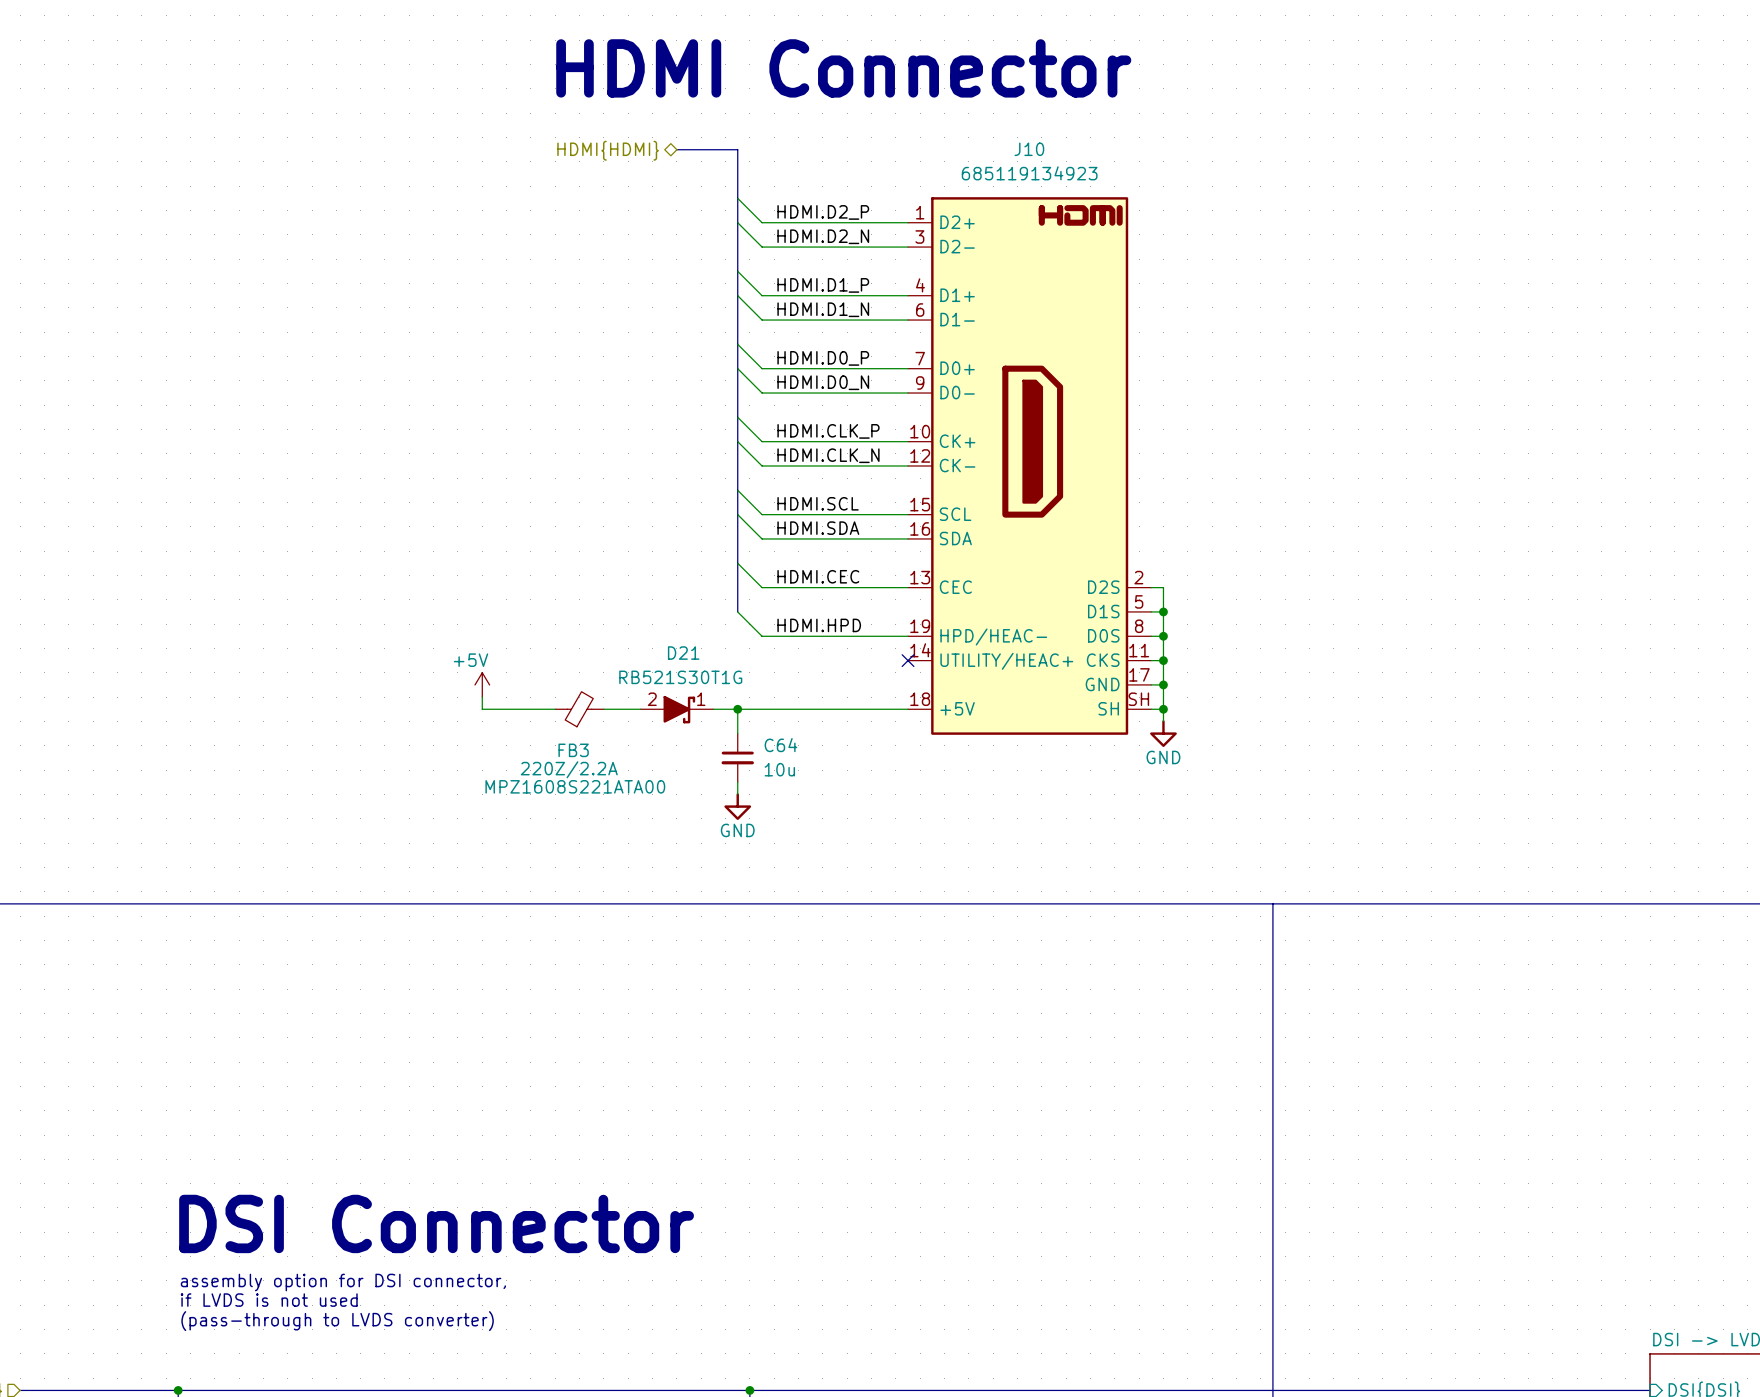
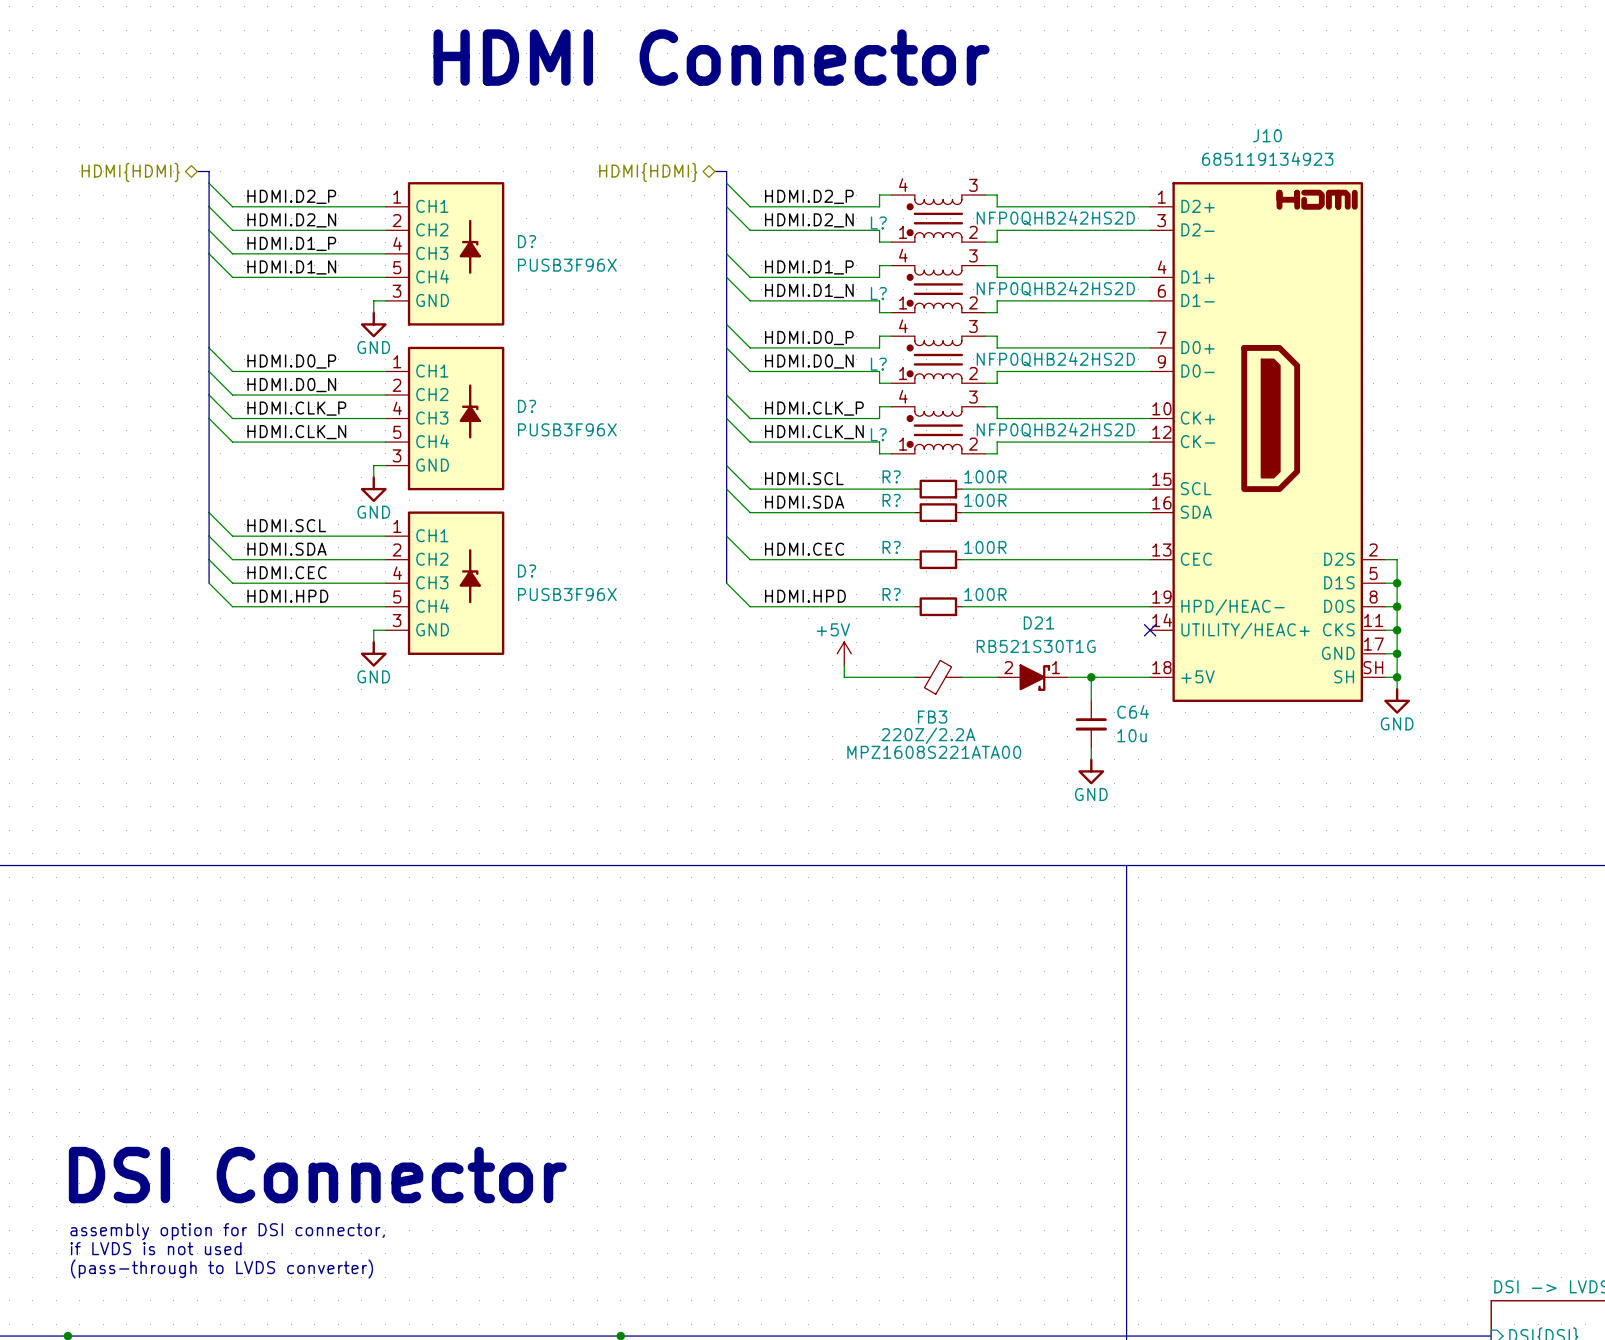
bus: (676, 149) (737, 149) (737, 611) -> none
hierarchical label position: HDMI{HDMI} (608, 150) -> HDMI{HDMI} (648, 172)
bus: none -> (197, 171) (209, 171) (209, 583)
bus: none -> (714, 171) (726, 171) (726, 583)
hierarchical label: none -> HDMI{HDMI} (130, 172)
wire: none -> (209, 183) (232, 206) (385, 206)
wire: (737, 198) (762, 222) (883, 222) -> (726, 183) (750, 206)
wire: none -> (985, 195) (997, 195) (997, 206) (1150, 206)
label: none -> HDMI.D2_P (291, 196)
label position: HDMI.D2_P (823, 212) -> HDMI.D2_P (809, 196)
wire: none -> (209, 206) (232, 230) (385, 230)
wire: (737, 222) (762, 247) (883, 247) -> (726, 206) (750, 230)
L?: none -> (938, 218)
label: none -> HDMI.D2_N (291, 220)
label position: HDMI.D2_N (823, 236) -> HDMI.D2_N (809, 220)
wire: none -> (209, 230) (232, 253) (385, 253)
wire: none -> (1150, 230) (997, 230) (997, 242) (985, 242)
label: none -> HDMI.D1_P (291, 243)
wire: none -> (209, 253) (232, 277) (385, 277)
D?: none -> (444, 253)
wire: (737, 271) (762, 295) (883, 295) -> (726, 253) (750, 277)
wire: none -> (985, 265) (997, 265) (997, 277) (1150, 277)
label: none -> HDMI.D1_N (291, 267)
label position: HDMI.D1_P (823, 285) -> HDMI.D1_P (809, 267)
wire: (737, 295) (762, 320) (883, 320) -> (726, 277) (750, 300)
L?: none -> (938, 289)
label position: HDMI.D1_N (823, 309) -> HDMI.D1_N (809, 290)
wire: none -> (385, 300) (373, 300) (373, 312)
wire: none -> (1150, 300) (997, 300) (997, 312) (985, 312)
power symbol: none -> GND (373, 324)
wire: (737, 344) (762, 368) (883, 368) -> (726, 324) (750, 347)
wire: none -> (985, 336) (997, 336) (997, 347) (1150, 347)
label position: HDMI.D0_P (823, 358) -> HDMI.D0_P (809, 338)
wire: none -> (209, 347) (232, 371) (385, 371)
wire: (737, 368) (762, 393) (883, 393) -> (726, 347) (750, 371)
L?: none -> (938, 359)
label: none -> HDMI.D0_P (291, 361)
label position: HDMI.D0_N (823, 382) -> HDMI.D0_N (809, 361)
wire: none -> (209, 371) (232, 395) (385, 395)
wire: none -> (1150, 371) (997, 371) (997, 383) (985, 383)
label: none -> HDMI.D0_N (291, 385)
wire: none -> (209, 395) (232, 418) (385, 418)
wire: (737, 417) (762, 441) (883, 441) -> (726, 395) (750, 418)
wire: none -> (985, 406) (997, 406) (997, 418) (1150, 418)
label: none -> HDMI.CLK_P (296, 408)
label position: HDMI.CLK_P (828, 431) -> HDMI.CLK_P (814, 408)
wire: none -> (209, 418) (232, 442) (385, 442)
D?: none -> (444, 418)
wire: (737, 441) (762, 465) (883, 465) -> (726, 418) (750, 442)
L?: none -> (938, 430)
label: none -> HDMI.CLK_N (296, 432)
label position: HDMI.CLK_N (828, 455) -> HDMI.CLK_N (814, 432)
J10 position: (1029, 465) -> (1267, 442)
wire: none -> (1150, 442) (997, 442) (997, 453) (985, 453)
wire: none -> (385, 465) (373, 465) (373, 477)
wire: (737, 490) (762, 514) (883, 514) -> (726, 465) (750, 489)
label position: HDMI.SCL (818, 503) -> HDMI.SCL (804, 478)
power symbol: none -> GND (373, 489)
wire: (737, 514) (762, 538) (883, 538) -> (726, 489) (750, 512)
R?: none -> (938, 489)
wire: none -> (961, 489) (1150, 489)
label position: HDMI.SDA (818, 528) -> HDMI.SDA (804, 502)
wire: none -> (209, 512) (232, 536) (385, 536)
R?: none -> (938, 512)
wire: none -> (961, 512) (1150, 512)
label: none -> HDMI.SCL (286, 525)
wire: none -> (209, 536) (232, 559) (385, 559)
wire: (737, 563) (762, 587) (883, 587) -> (726, 536) (750, 559)
label: none -> HDMI.SDA (287, 549)
label position: HDMI.CEC (818, 576) -> HDMI.CEC (804, 549)
wire: none -> (209, 559) (232, 583) (385, 583)
R?: none -> (938, 559)
wire: (1163, 587) (1163, 721) -> (1020, 559) (1150, 559)
wire: none -> (1385, 559) (1397, 559) (1397, 689)
label: none -> HDMI.CEC (287, 572)
wire: none -> (209, 583) (232, 606) (385, 606)
D?: none -> (444, 583)
wire: (737, 611) (762, 636) (883, 636) -> (726, 583) (750, 606)
wire: (1151, 611) (1163, 611) -> none
junction: (1163, 611) -> none
wire: none -> (1385, 583) (1397, 583)
junction: none -> (1397, 583)
label: none -> HDMI.HPD (287, 596)
label position: HDMI.HPD (819, 625) -> HDMI.HPD (805, 596)
R?: none -> (938, 606)
wire: none -> (1020, 606) (1150, 606)
junction: (1163, 636) -> none
wire: none -> (1385, 606) (1397, 606)
junction: none -> (1397, 606)
wire: none -> (385, 630) (373, 630) (373, 642)
no-connect mark: (908, 660) -> none
wire: (1151, 660) (1163, 660) -> none
junction: (1163, 660) -> none
no-connect mark: none -> (1150, 630)
wire: none -> (1385, 630) (1397, 630)
junction: none -> (1397, 630)
power symbol: +5V (482, 684) -> none
power symbol: none -> GND (373, 653)
power symbol: none -> +5V (844, 653)
wire: (1151, 684) (1163, 684) -> none
junction: (1163, 684) -> none
wire: none -> (1385, 653) (1397, 653)
junction: none -> (1397, 653)
wire: (482, 697) (482, 709) (555, 709) -> none
FB3 position: (579, 709) -> (938, 677)
wire: (603, 709) (640, 709) -> none
D21 position: (676, 709) -> (1032, 677)
wire: (713, 709) (908, 709) -> none
wire: (737, 709) (737, 733) -> none
junction: (737, 709) -> none
junction: (1163, 709) -> none
wire: none -> (1067, 677) (1150, 677)
wire: none -> (1091, 677) (1091, 700)
junction: none -> (1091, 677)
wire: none -> (1385, 677) (1397, 677)
junction: none -> (1397, 677)
power symbol position: GND (1163, 733) -> GND (1091, 771)
power symbol: none -> GND (1397, 700)
C64 position: (737, 757) -> (1091, 724)
wire: (737, 782) (737, 794) -> none
wire: none -> (1091, 747) (1091, 759)
power symbol: GND (737, 806) -> none

